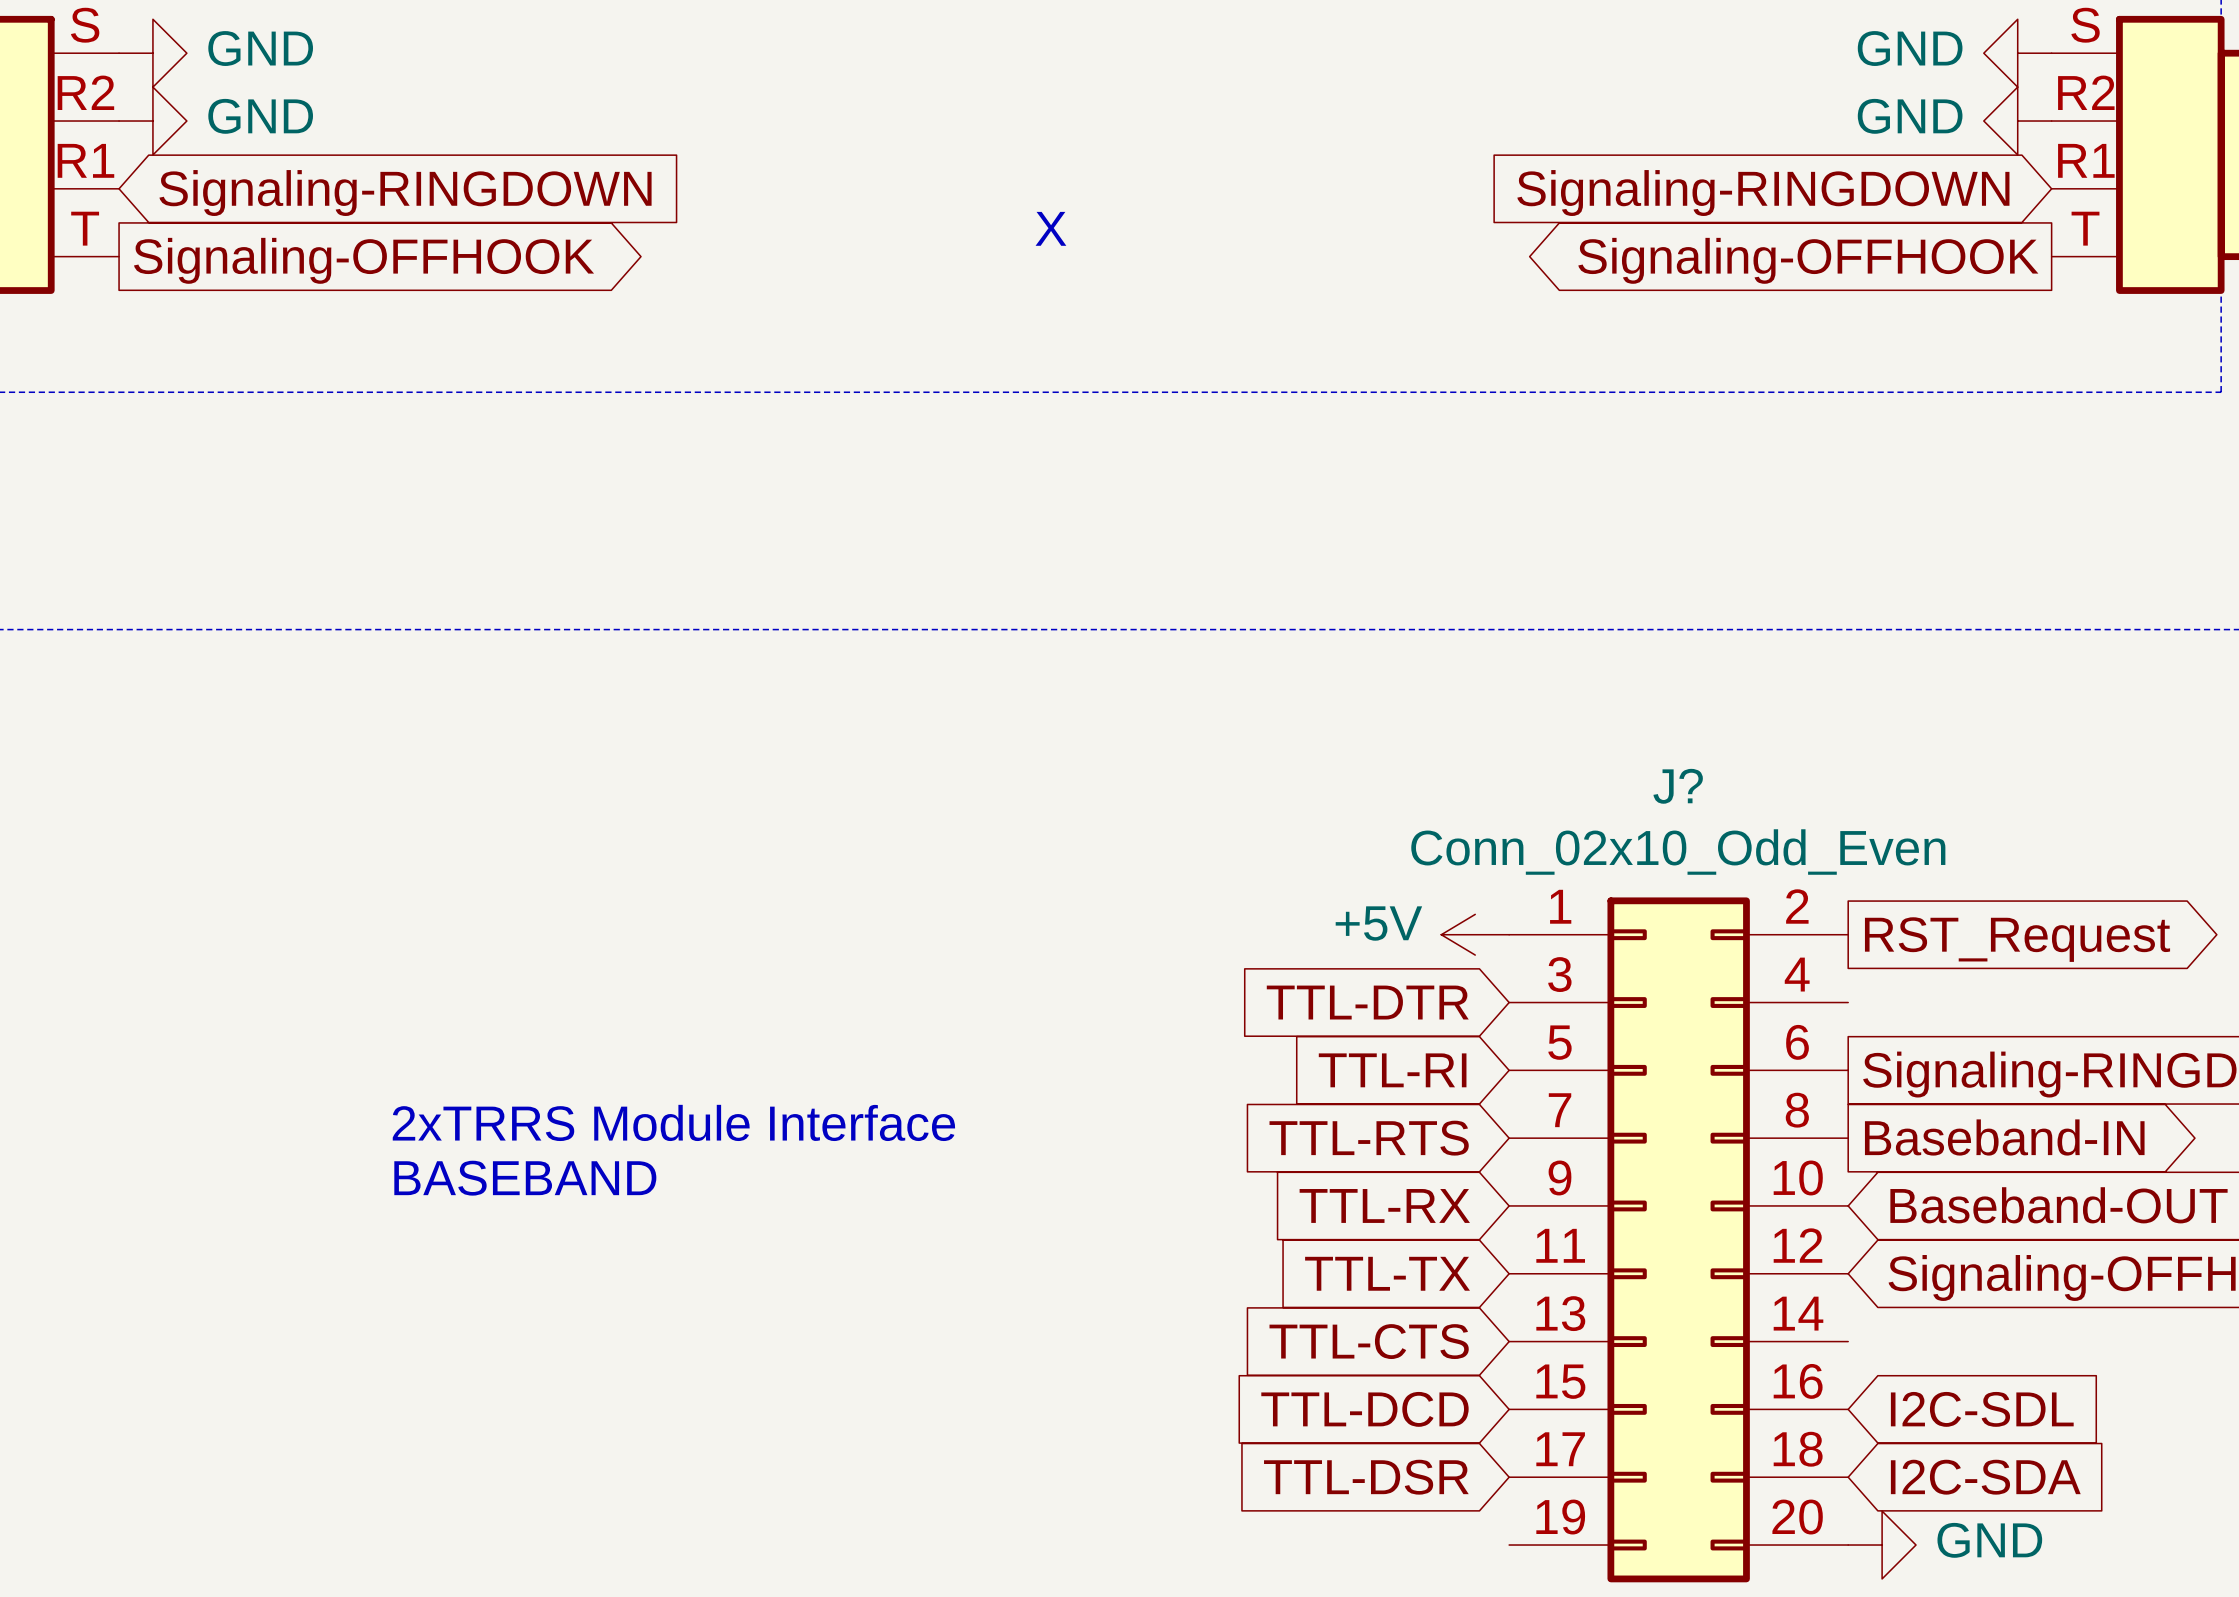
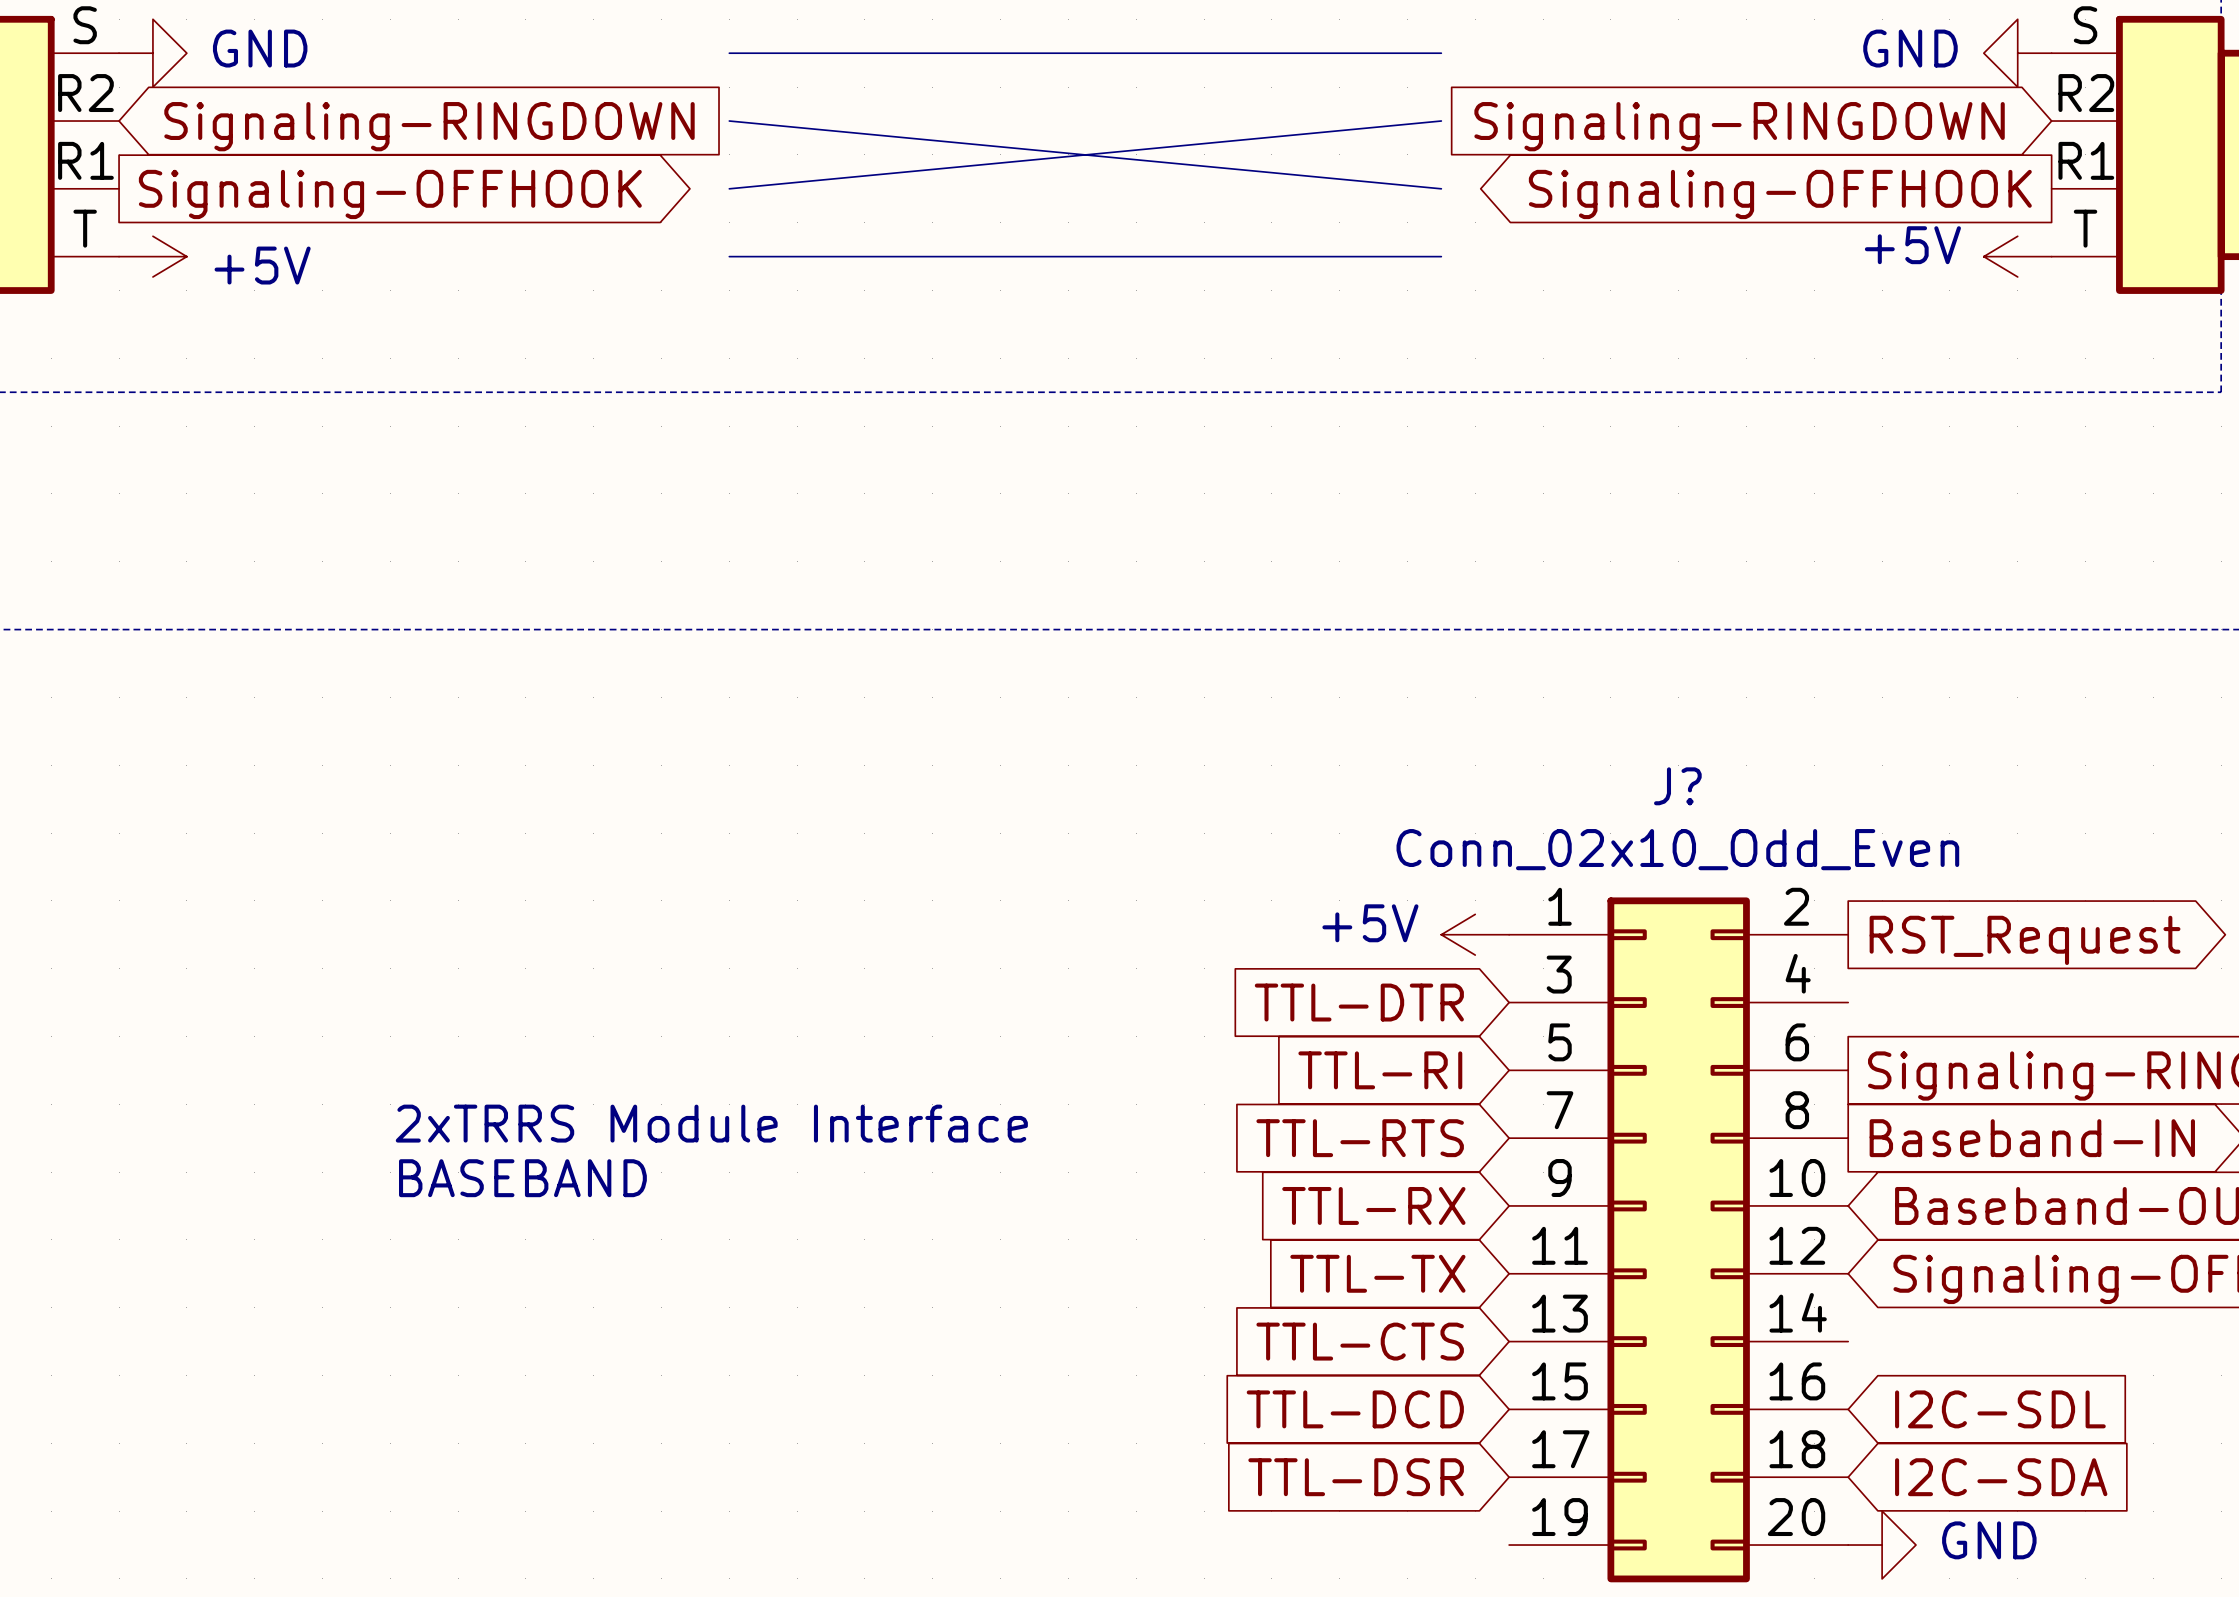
wire: none -> (729, 53) (1441, 53)
power symbol: GND (152, 121) -> none
wire: none -> (729, 121) (1441, 188)
wire: none -> (1441, 121) (729, 188)
power symbol: GND (2017, 121) -> none
global label: none -> Signaling-RINGDOWN (429, 126)
global label: none -> Signaling-RINGDOWN (1739, 126)
global label shape: input (405, 193) -> output (390, 194)
global label: Signaling-RINGDOWN (405, 193) -> Signaling-OFFHOOK (390, 194)
global label shape: input (1763, 193) -> output (1780, 194)
global label: Signaling-RINGDOWN (1763, 193) -> Signaling-OFFHOOK (1780, 194)
text: X (1050, 228) -> none
power symbol: none -> +5V (152, 256)
wire: none -> (729, 256) (1441, 256)
power symbol: none -> +5V (2017, 256)
global label: Signaling-OFFHOOK (364, 260) -> none
global label: Signaling-OFFHOOK (1808, 260) -> none

